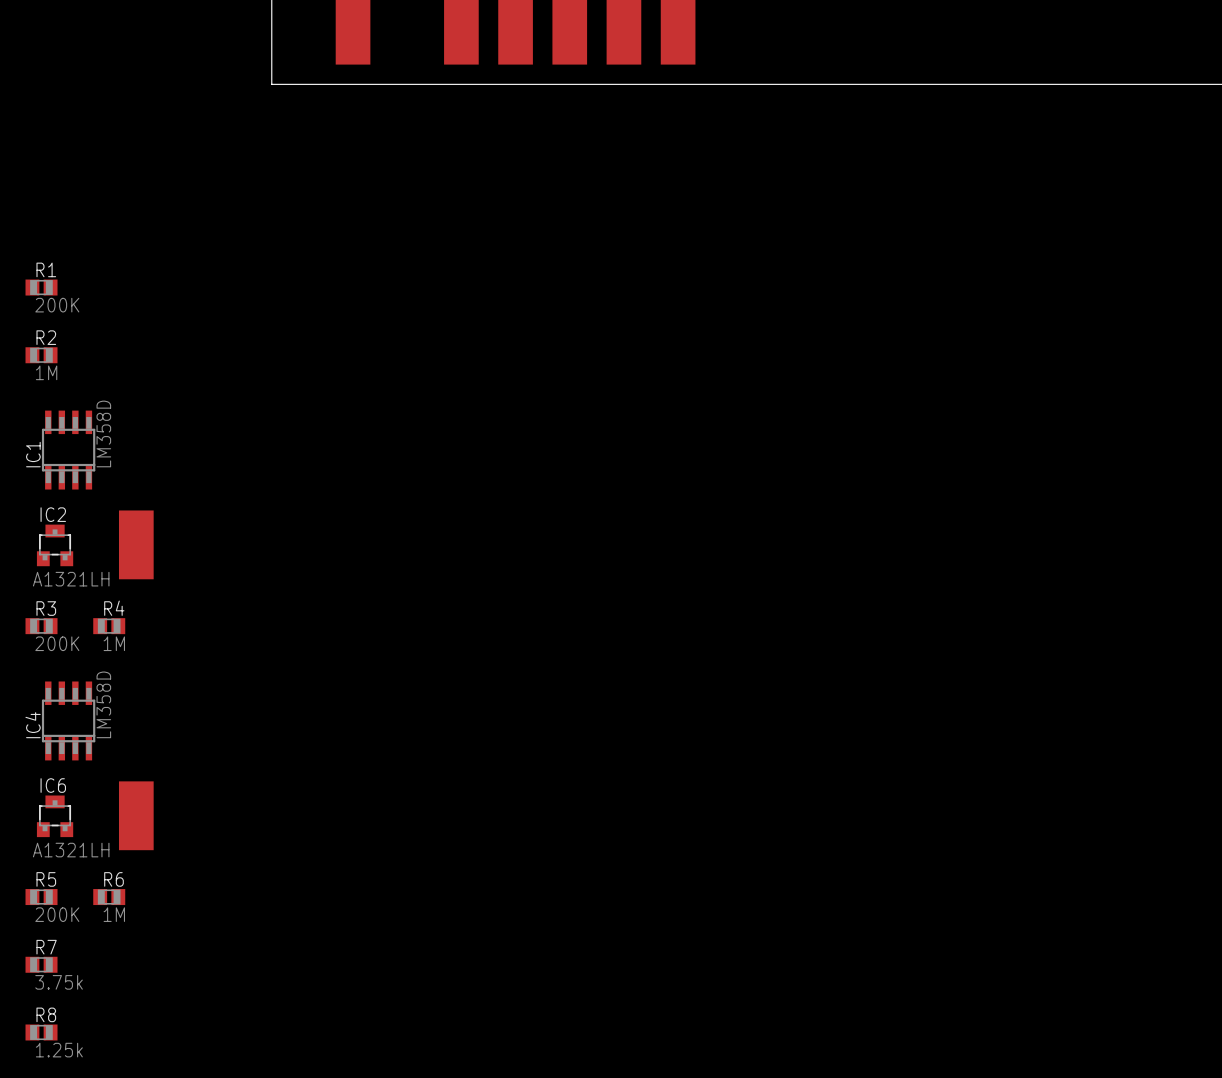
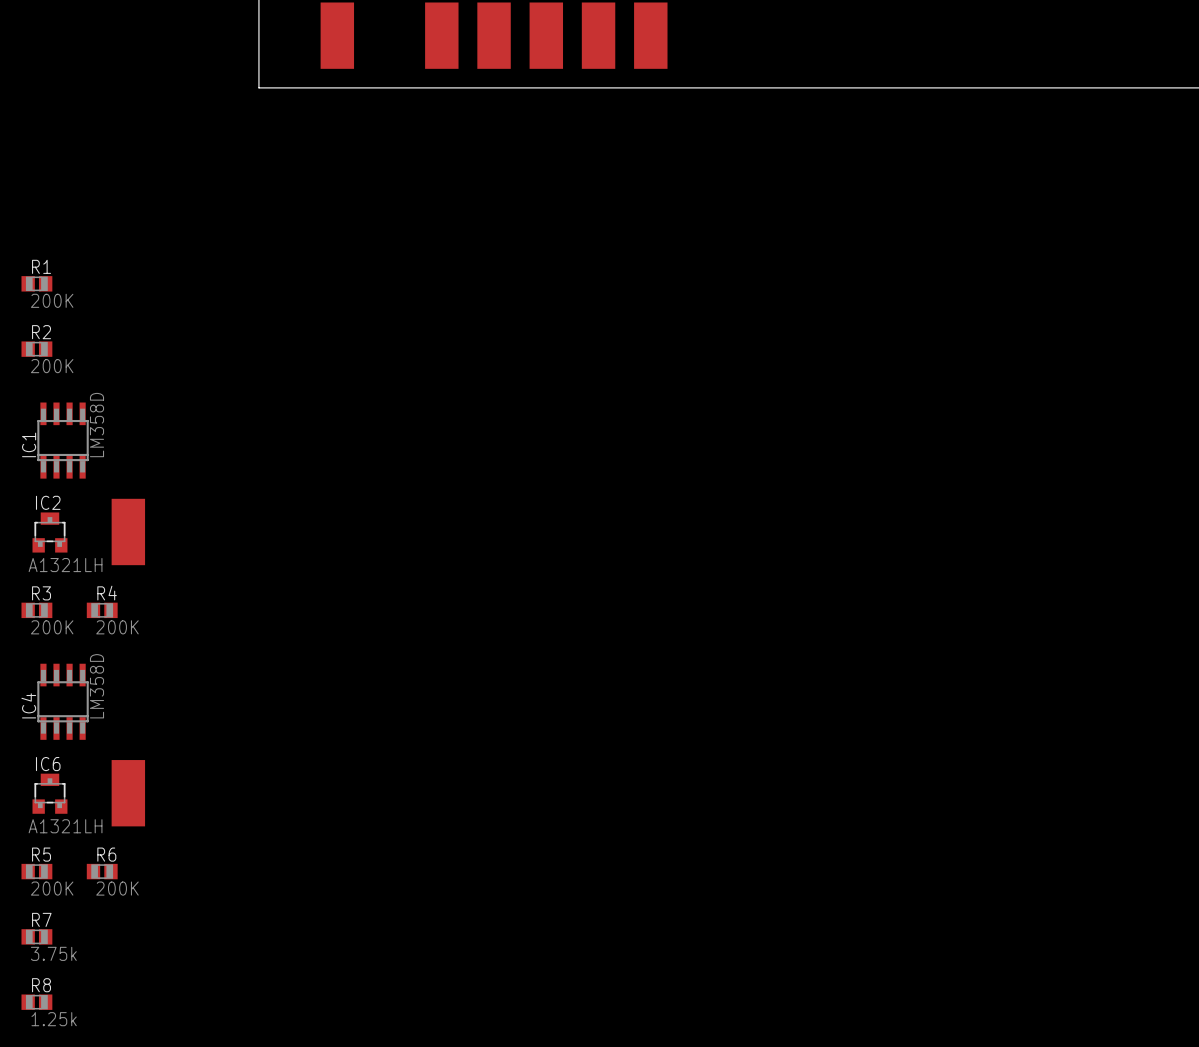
R2 value: 1M (46, 372) -> 200K (52, 366)
R4 value: 1M (114, 643) -> 200K (117, 627)
R6 value: 1M (114, 914) -> 200K (117, 888)

